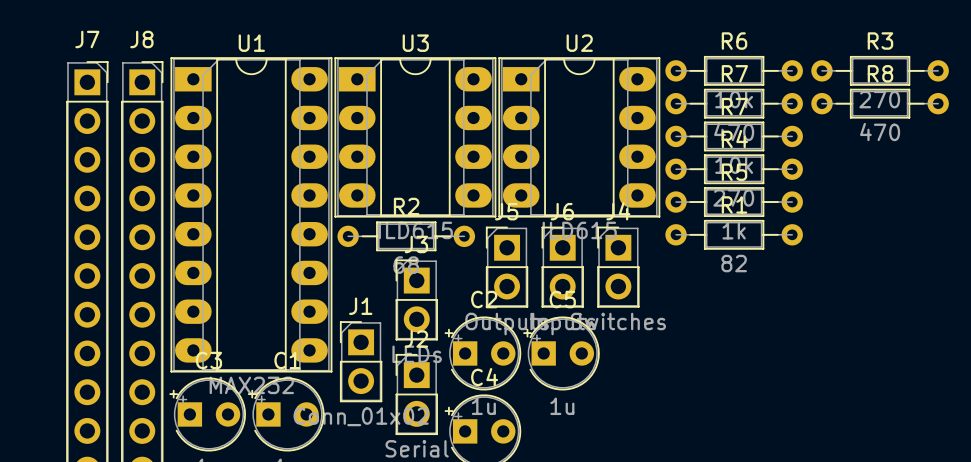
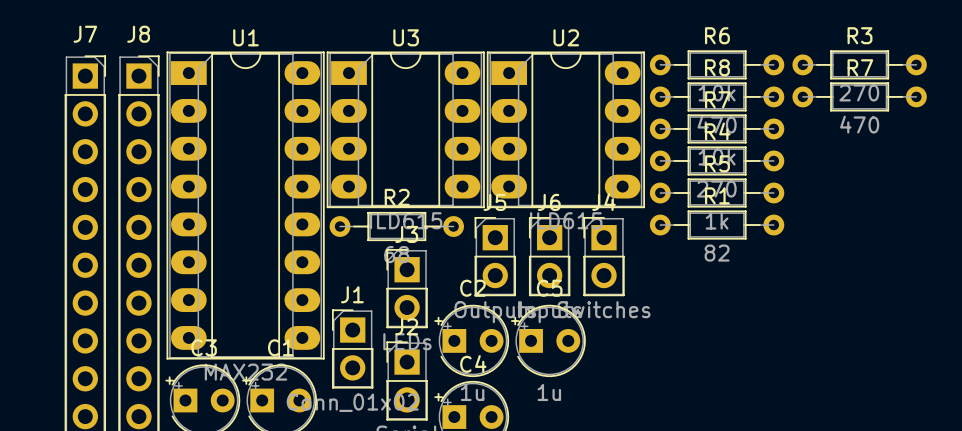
R7 name: R7 (734, 73) -> R8 (717, 67)
R8 name: R8 (880, 73) -> R7 (860, 67)

